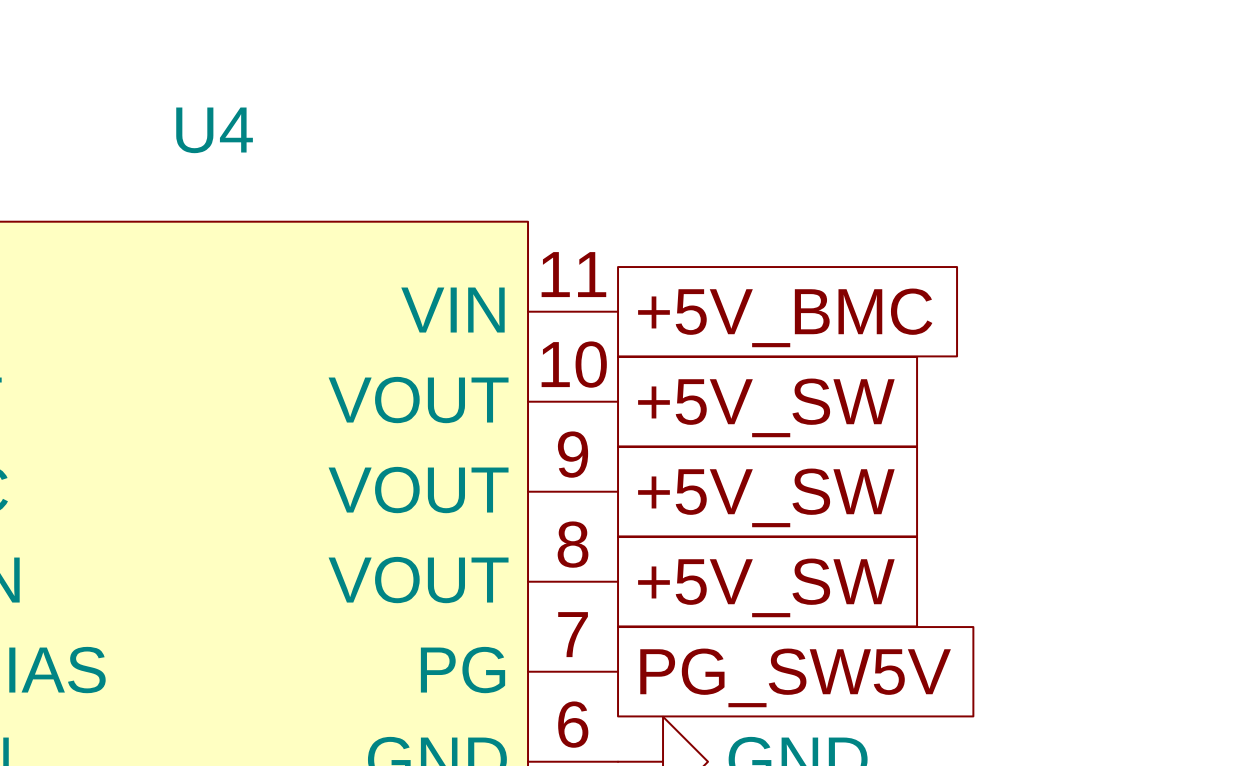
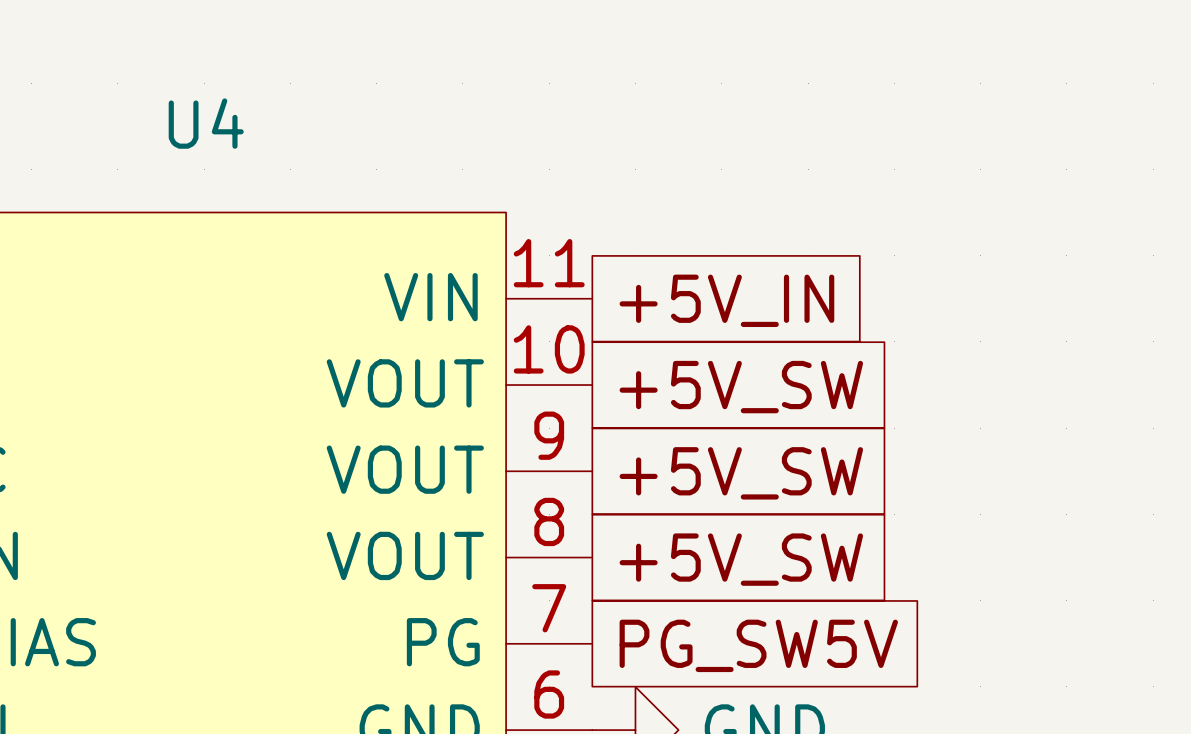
global label: +5V_BMC (785, 317) -> +5V_IN (726, 300)

